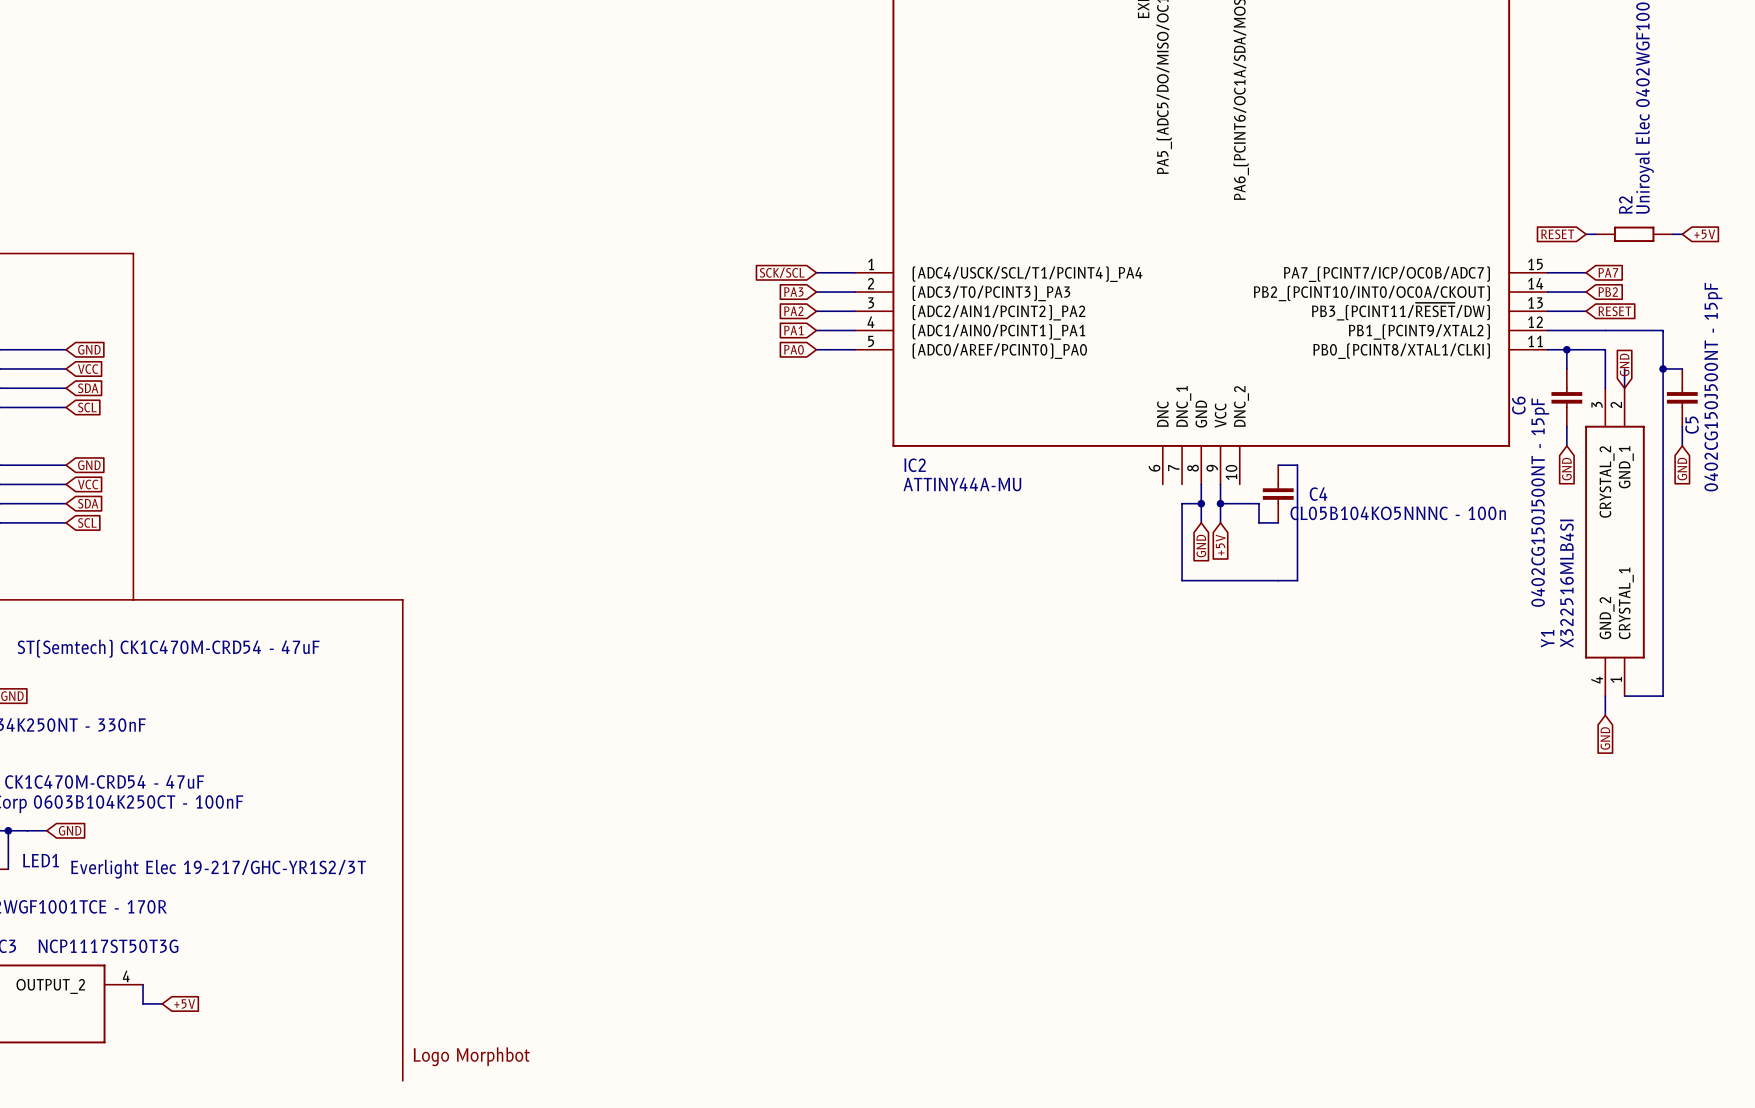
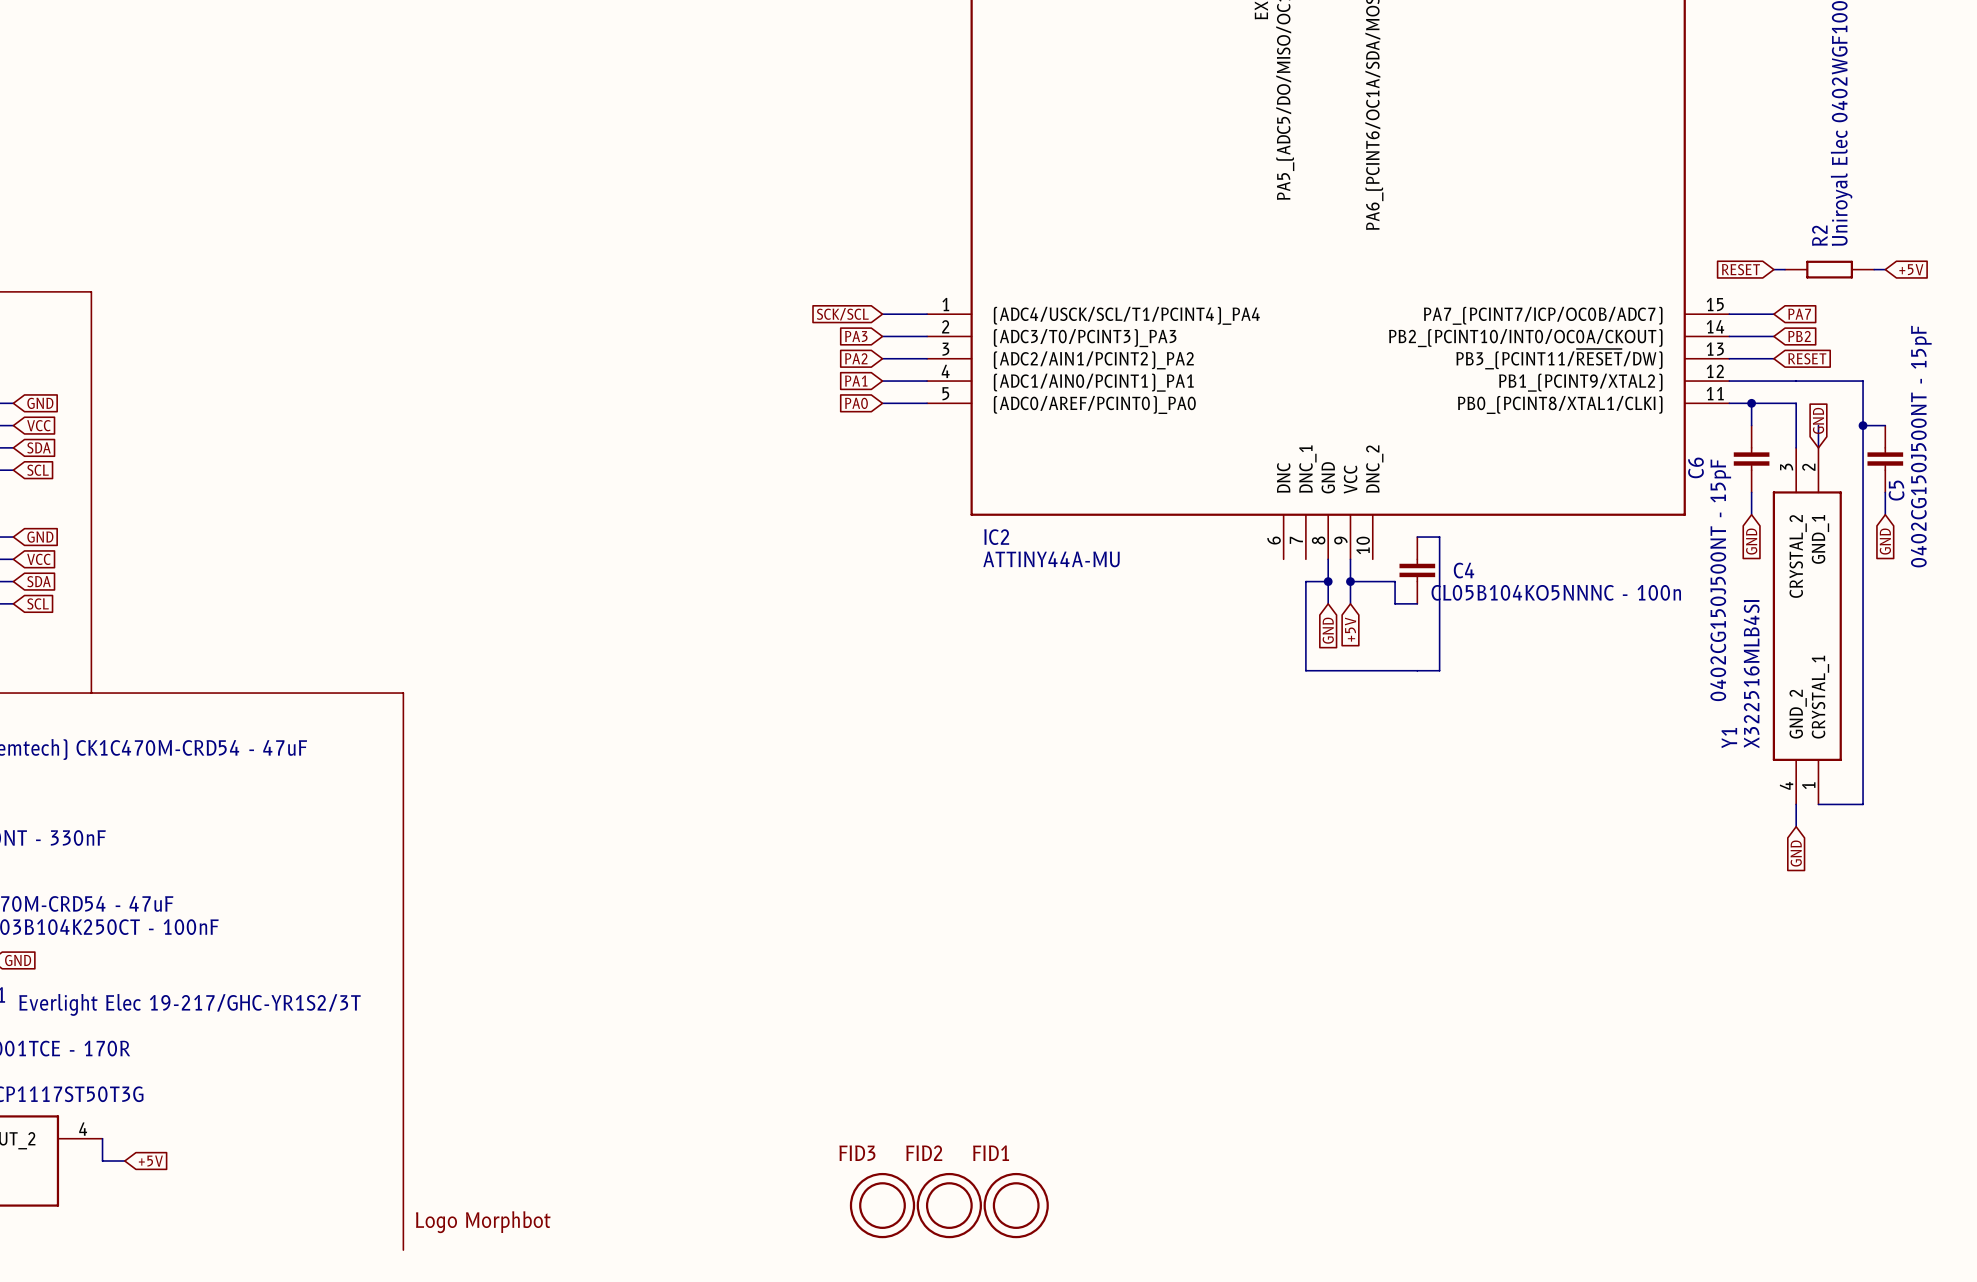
FID3: none -> (882, 1205)
FID2: none -> (949, 1205)
FID1: none -> (1016, 1205)

